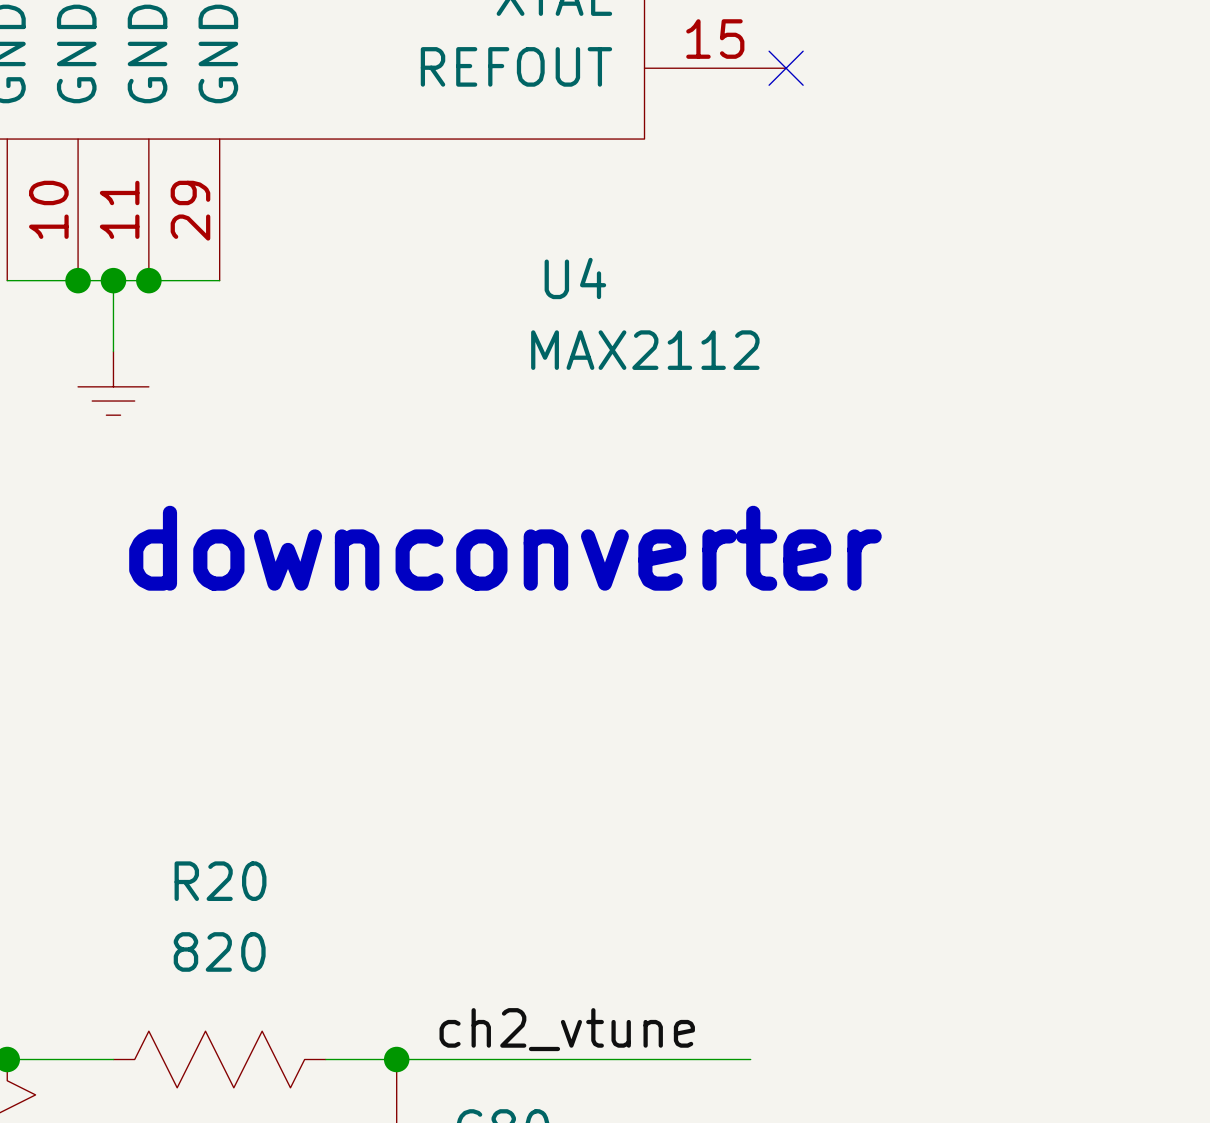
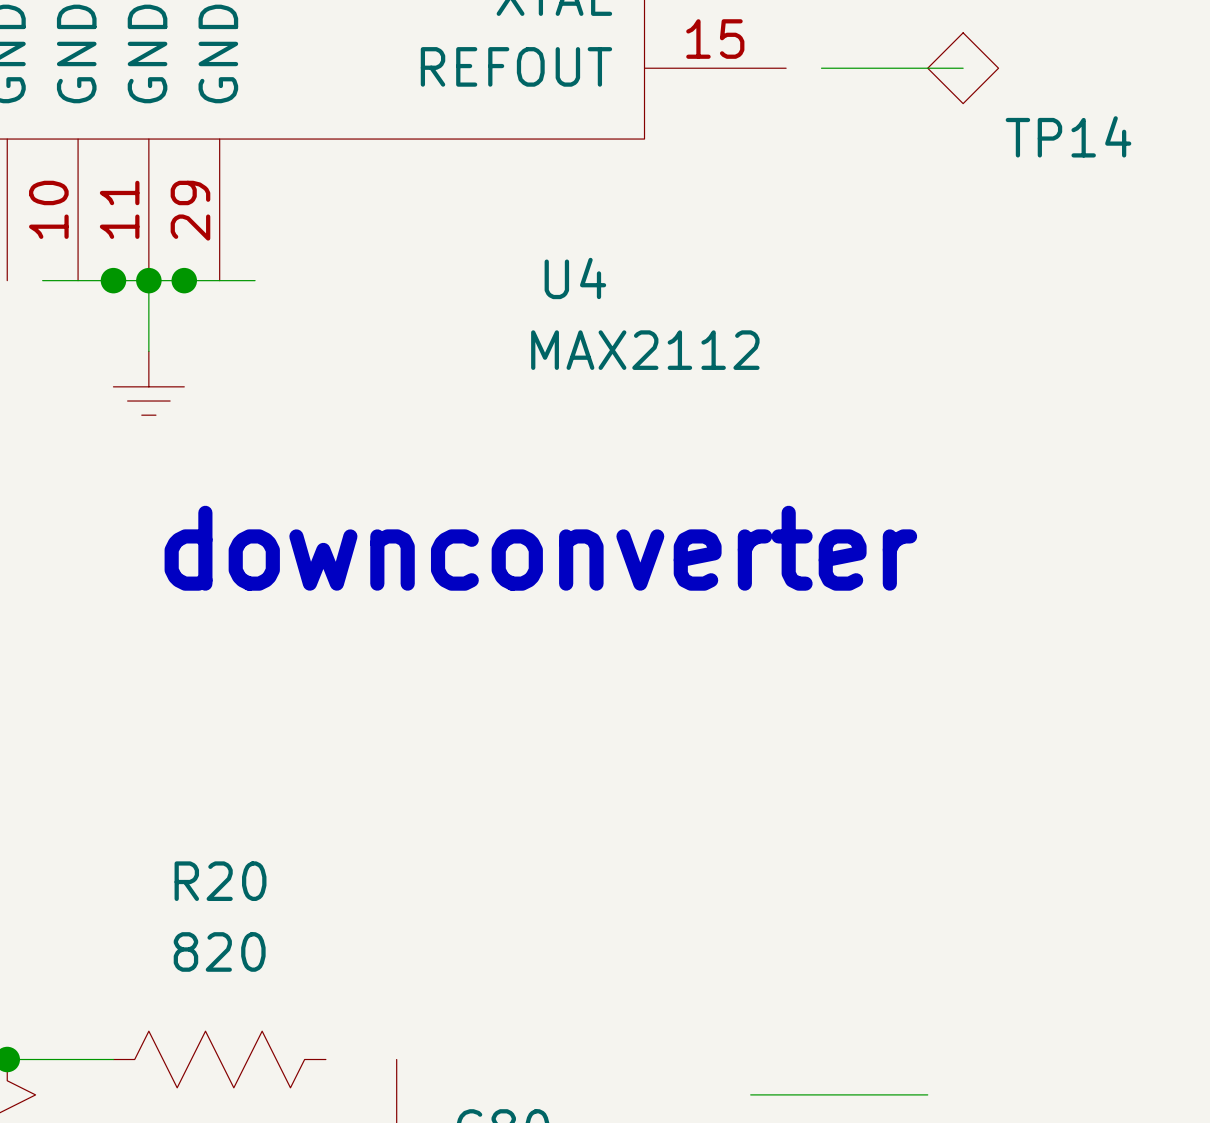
no-connect mark: (786, 68) -> none
wire: none -> (821, 68) (963, 68)
TP14: none -> (963, 68)
wire: (7, 280) (42, 280) -> (219, 280) (255, 280)
junction position: (78, 280) -> (184, 280)
wire: (113, 280) (113, 351) -> (148, 280) (148, 351)
power symbol position: (113, 383) -> (148, 383)
text position: downconverter (505, 548) -> downconverter (540, 548)
label: ch2_vtune (567, 1029) -> none
wire: (325, 1059) (750, 1059) -> none
junction: (396, 1059) -> none
wire: none -> (750, 1094) (927, 1094)

